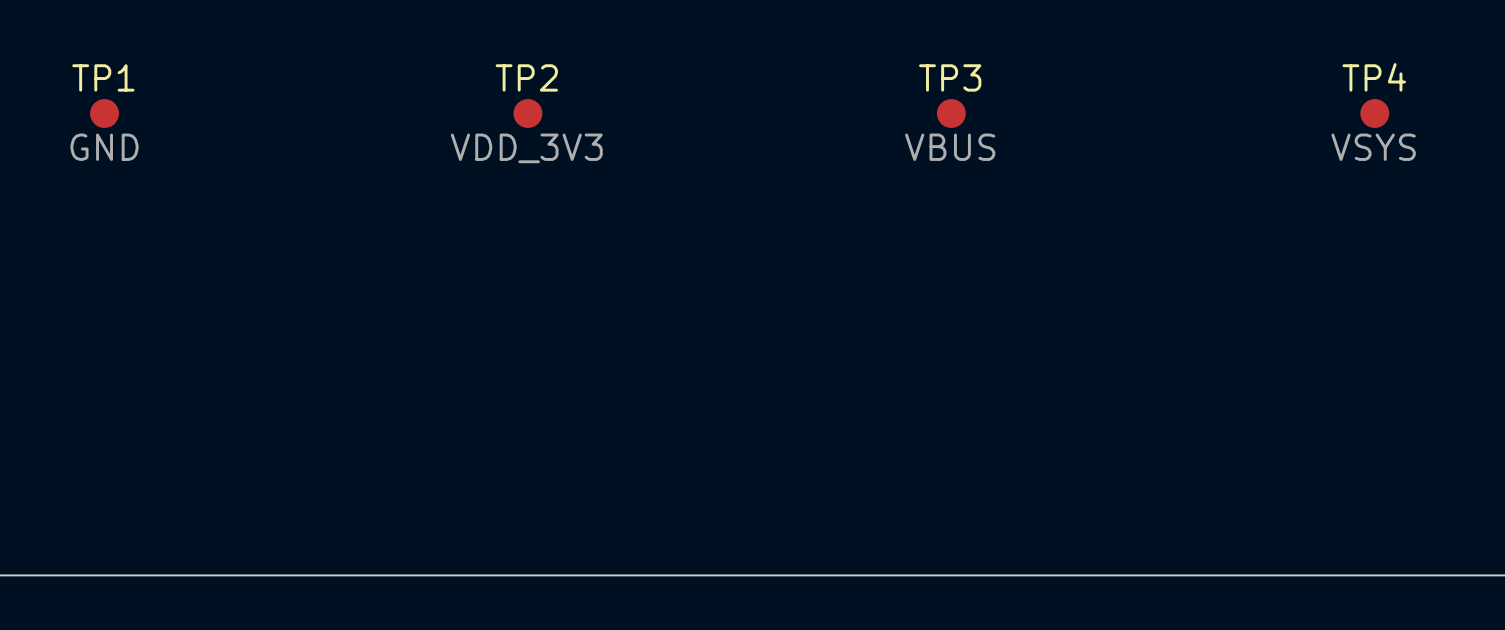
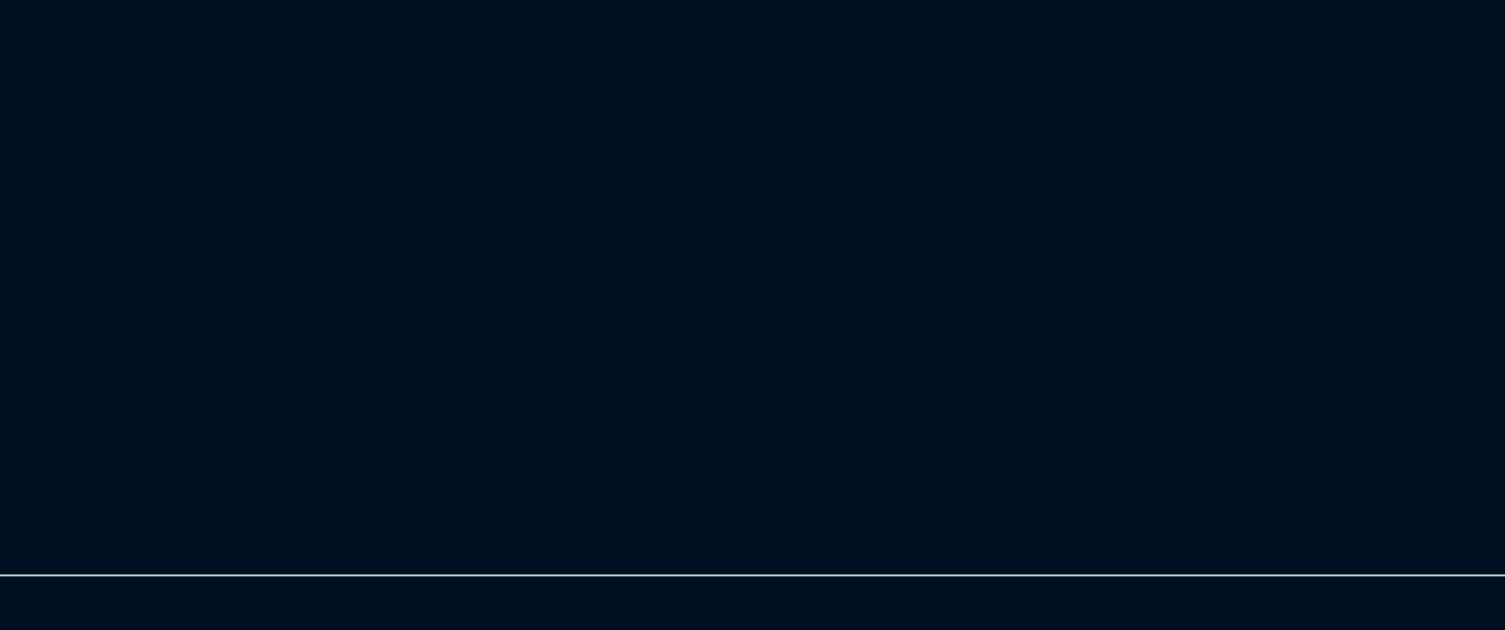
TP1: GND (104, 113) -> none
TP2: VDD_3V3 (527, 113) -> none
TP3: VBUS (951, 113) -> none
TP4: VSYS (1374, 113) -> none

